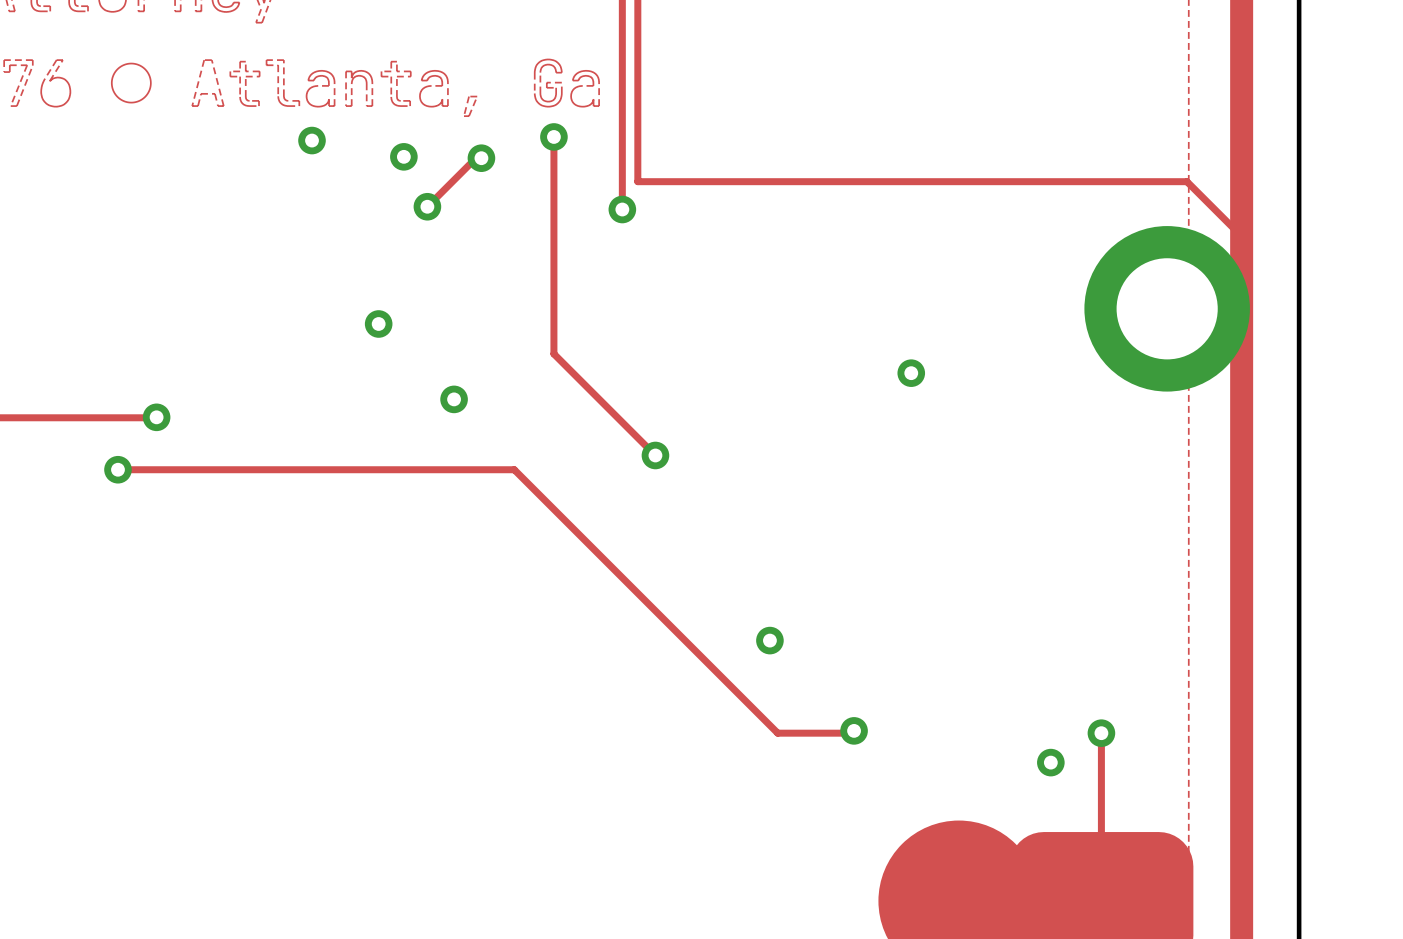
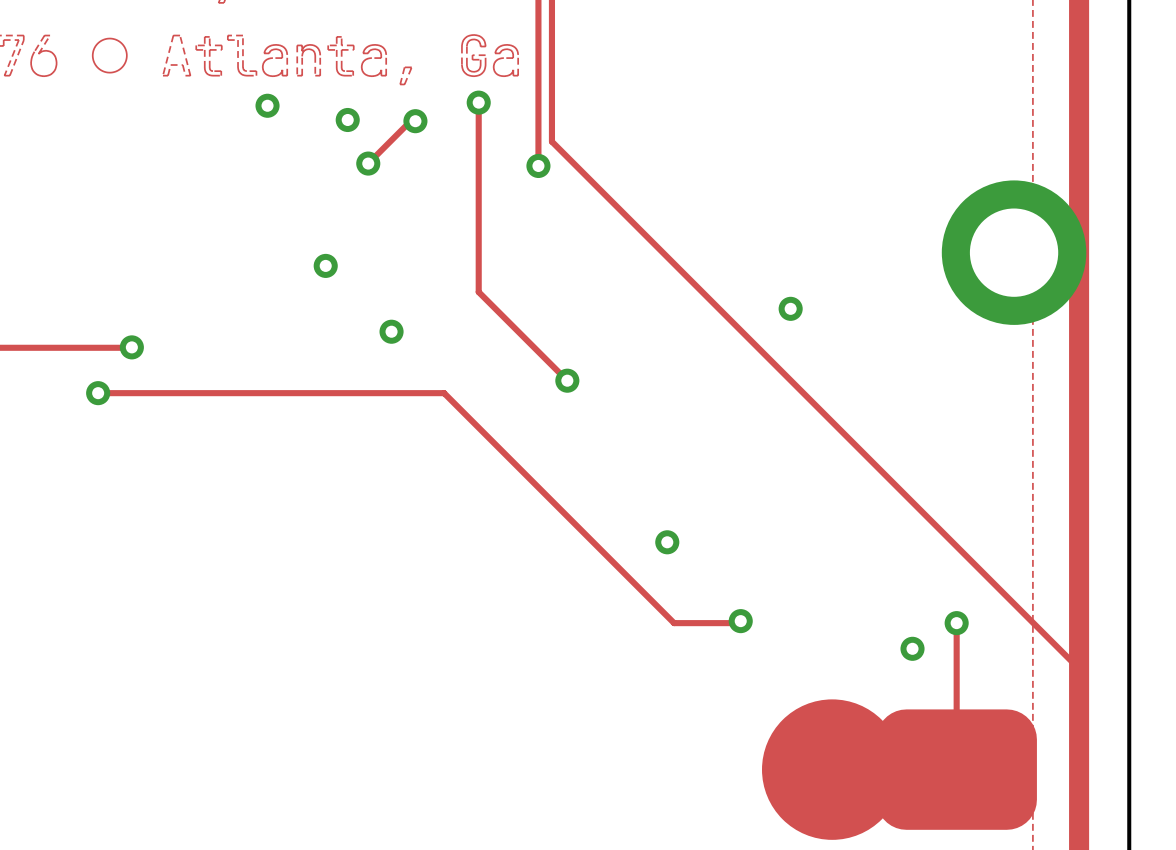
track: (637, 181) (1186, 181) (1241, 236) (1241, 785) -> (551, 141) (1079, 668)

